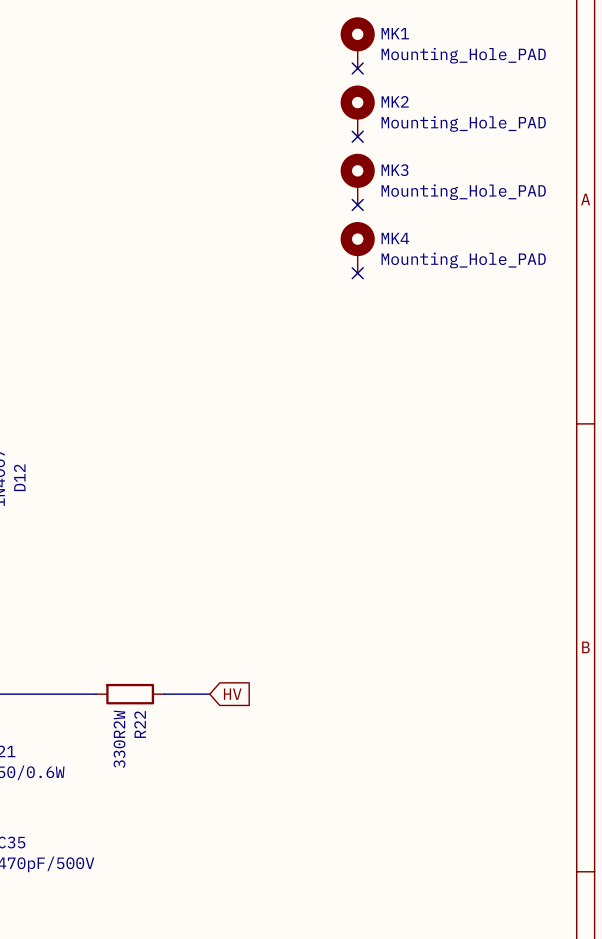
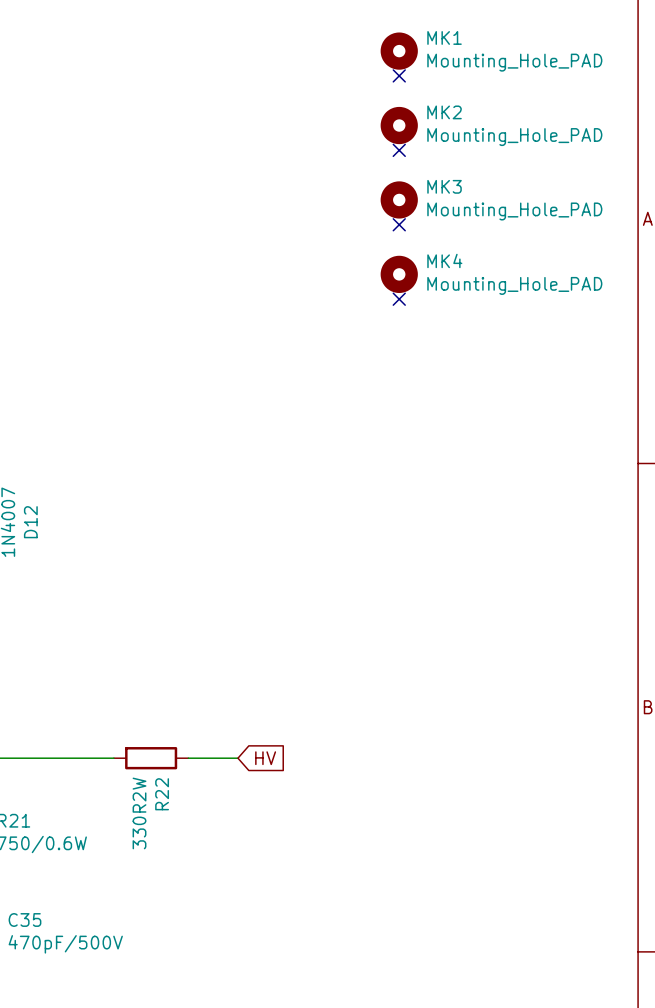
MK1 symbol: [340, 17, 375, 69] -> [380, 32, 418, 70]
MK2 symbol: [340, 85, 375, 137] -> [380, 106, 418, 145]
MK3 symbol: [340, 153, 375, 205] -> [380, 181, 418, 219]
MK4 symbol: [340, 222, 375, 274] -> [380, 255, 418, 294]

